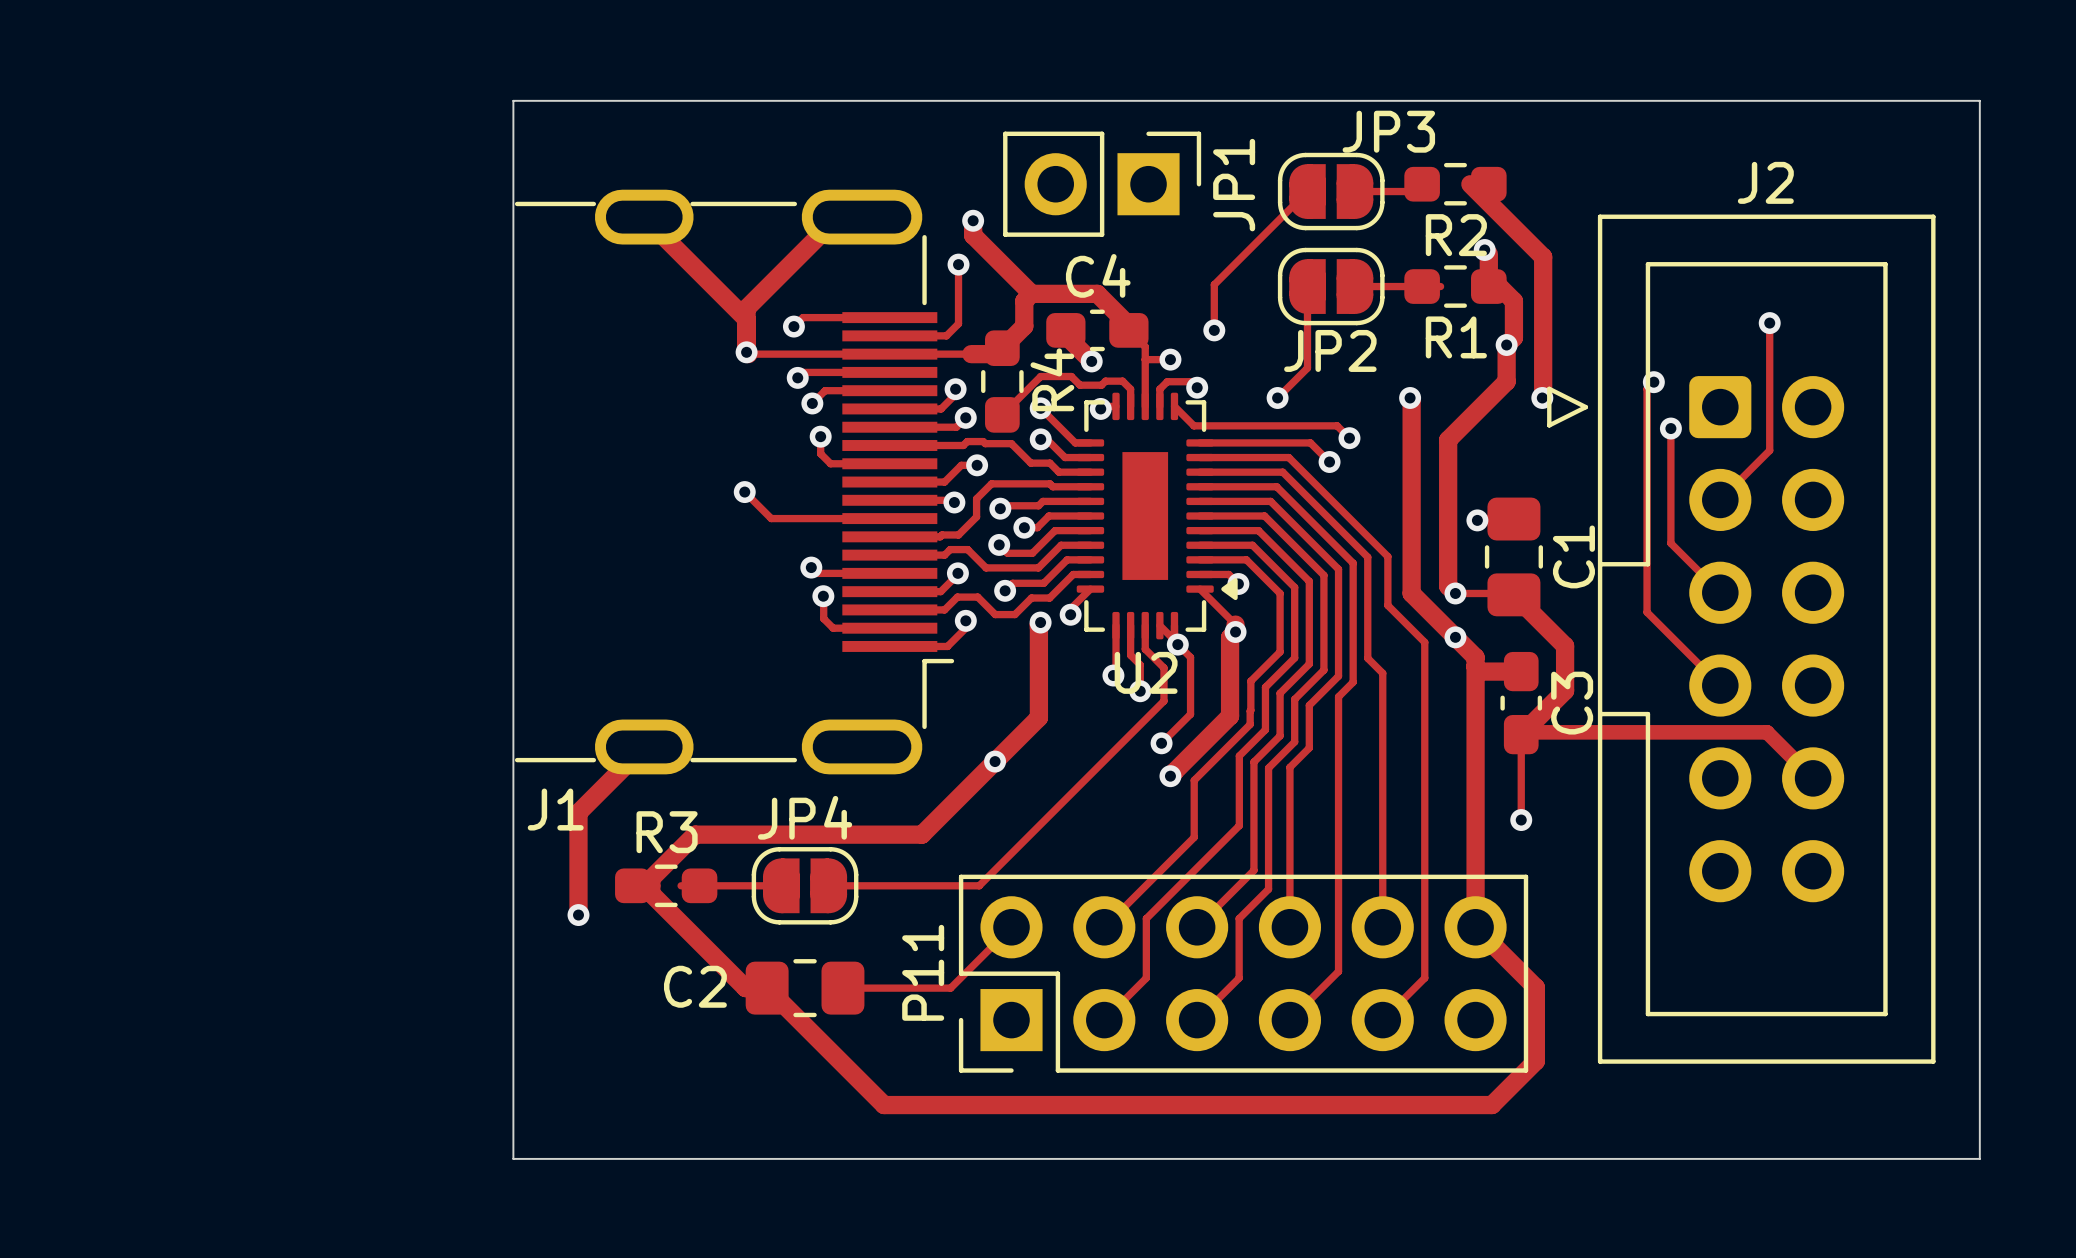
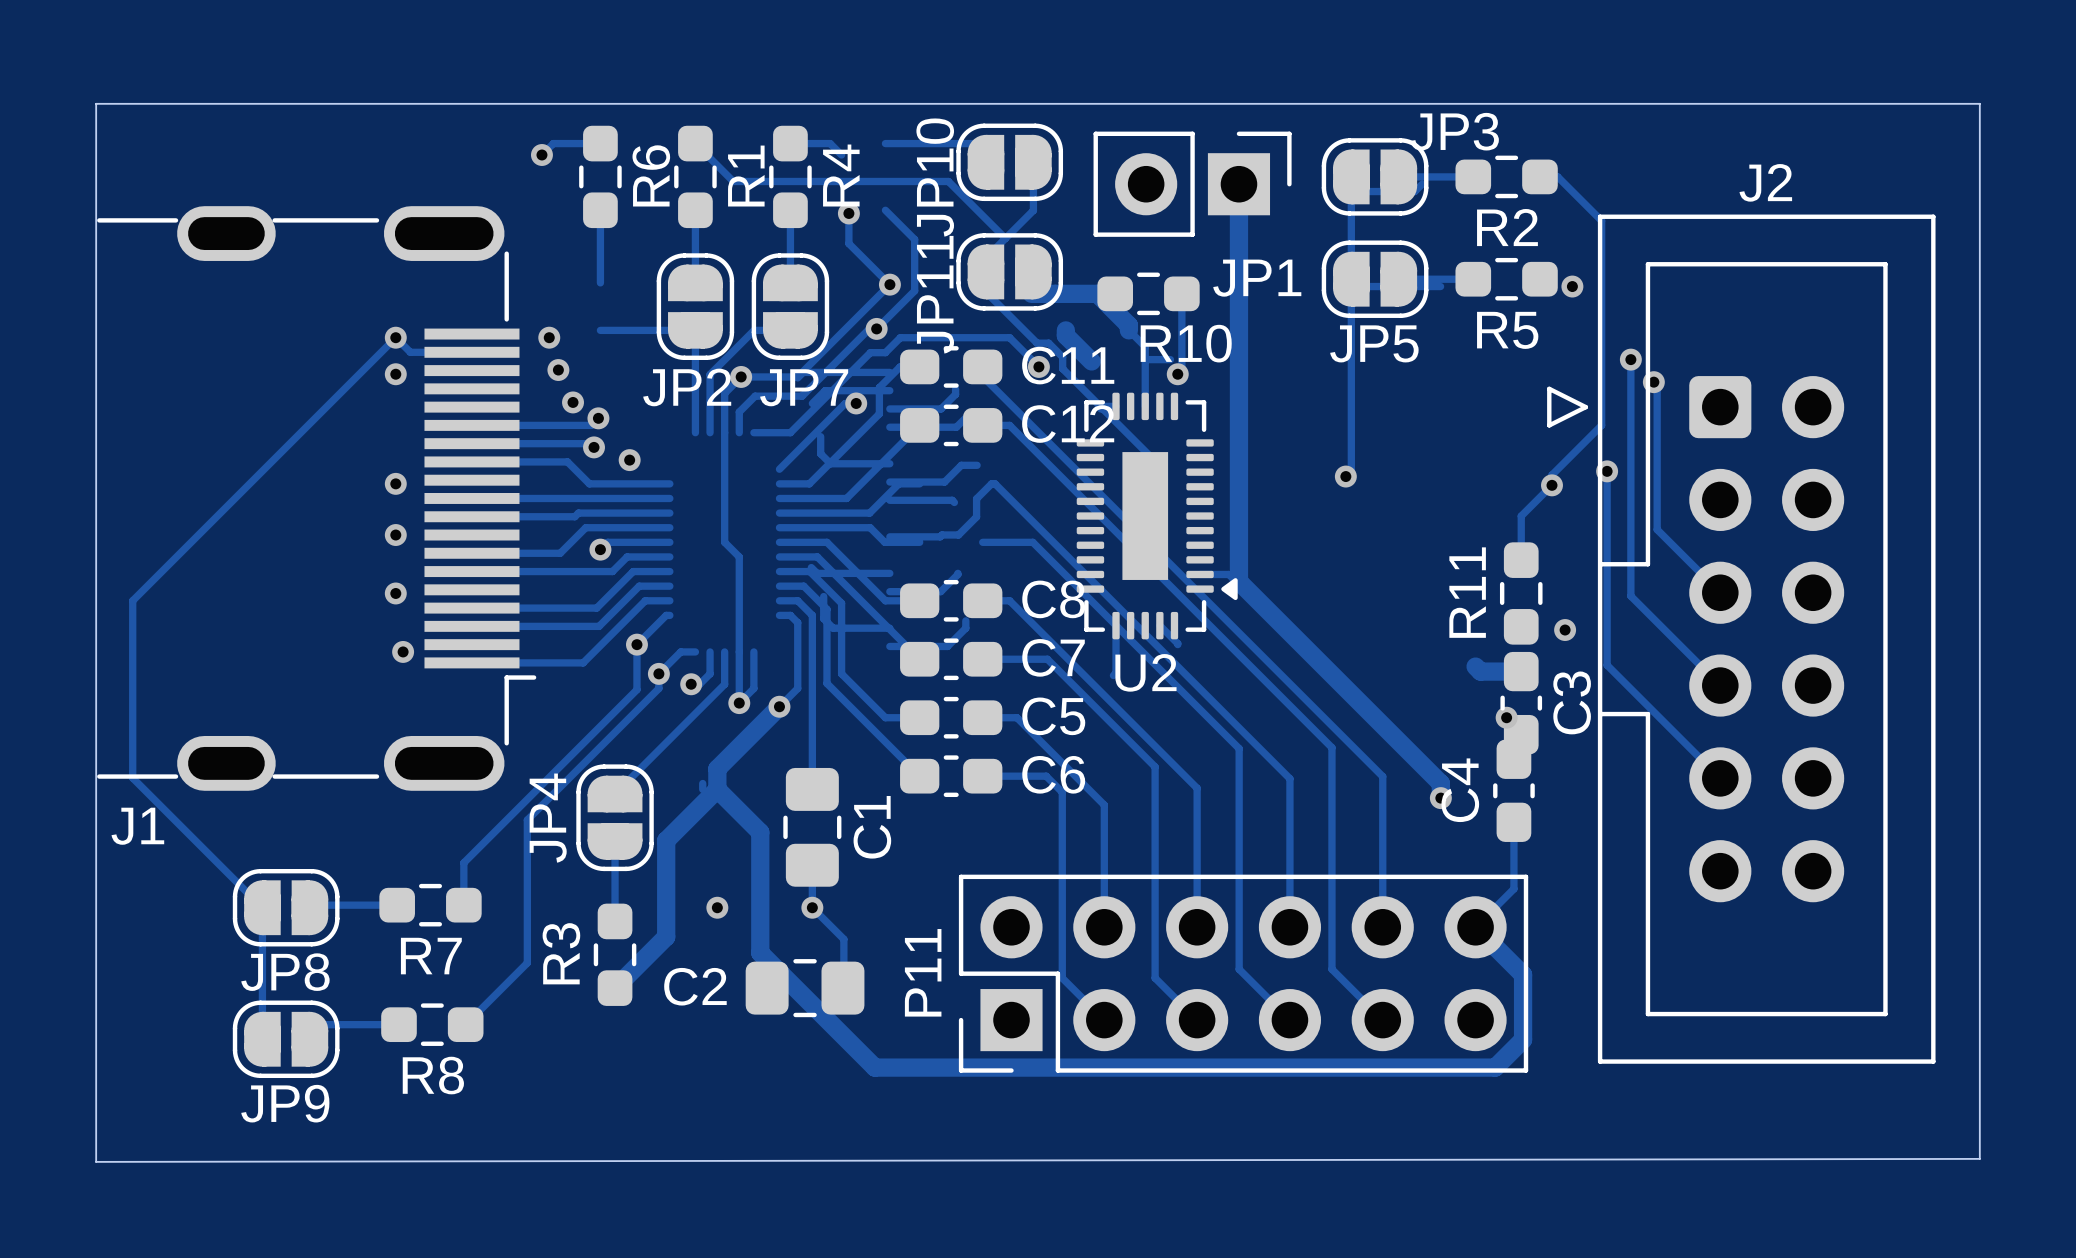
board edge: (1979, 103) (1979, 100) (513, 100) (513, 1158) (1979, 1158) -> (1979, 103) (96, 103) (96, 1161) (1979, 1158)
JP3 name position: JP3 (1388, 131) -> JP3 (1454, 131)
track: none -> (600, 143) (553, 143) (541, 154)
track: none -> (695, 143) (733, 181) (948, 181) (1005, 238)
track: none -> (790, 143) (830, 143) (841, 154)
track: none -> (885, 143) (974, 143) (985, 154)
via: none -> (541, 154)
JP10: none -> (1009, 162)
track: none -> (1033, 162) (1033, 210) (985, 257) (985, 292) (1037, 343) (1048, 343) (1062, 357) (1062, 368) (1155, 461) (1155, 498)
R6: none -> (600, 176)
track: none -> (1351, 176) (1351, 471) (1345, 476)
track: none -> (1398, 176) (1473, 176)
track: none -> (1539, 176) (1557, 176) (1601, 220) (1601, 425) (1551, 475) (1551, 485) (1521, 516) (1521, 560)
JP1 position: (1102, 184) -> (1192, 184)
track: none -> (1238, 184) (1238, 581) (1440, 783) (1440, 798)
R2 position: (1455, 184) -> (1506, 176)
track: (1470, 184) (1543, 257) (1542, 397) -> none
JP1 name rotation: 0° (1234, 185) -> 90° clockwise (1257, 278)
track: (1307, 191) (1214, 284) (1214, 330) -> none
JP3 position: (1331, 191) -> (1375, 176)
track: none -> (600, 210) (600, 282)
track: none -> (695, 210) (695, 282)
track: none -> (790, 210) (790, 282)
track: none -> (885, 210) (914, 239) (914, 290) (876, 328) (869, 328) (802, 396) (755, 396) (739, 412) (739, 432)
track: none -> (848, 213) (848, 243) (889, 284) (797, 376) (741, 376) (724, 393) (724, 542) (739, 556) (739, 703) (753, 688) (753, 651)
via: none -> (848, 213)
track: (644, 217) (746, 319) -> none
track: (862, 217) (837, 217) (746, 308) (746, 352) (748, 354) (996, 354) (1024, 326) (1024, 301) (1031, 293) (973, 235) (973, 220) -> none
via: (973, 220) -> none
track: (1484, 250) (1488, 254) (1488, 286) (1499, 286) (1513, 301) (1513, 337) (1506, 345) (1506, 381) (1448, 440) (1448, 586) (1455, 593) (1512, 593) (1565, 646) (1565, 690) (1521, 734) -> none
via: (1484, 250) -> none
track: (958, 264) (958, 323) (946, 335) (889, 335) -> none
via: (958, 264) -> none
JP11: none -> (1009, 271)
C4 name position: C4 (1098, 275) -> C4 (1460, 790)
JP5: none -> (1375, 279)
track: none -> (1398, 279) (1473, 279)
R5: none -> (1506, 279)
via: none -> (889, 284)
track: (1307, 286) (1307, 368) (1277, 397) -> none
JP2 rotation: 0° (1331, 286) -> 90° clockwise (695, 306)
JP2 position: (1331, 286) -> (695, 306)
R1 rotation: 0° (1455, 286) -> 90° clockwise (695, 176)
R1 position: (1455, 286) -> (695, 176)
via: none -> (1572, 286)
R10: none -> (1148, 293)
track: none -> (1181, 293) (1181, 370) (1177, 374)
JP7: none -> (790, 306)
track: (889, 317) (802, 317) (793, 326) -> none
track: (1769, 323) (1769, 450) (1720, 499) -> none
via: (1769, 323) -> none
via: (793, 326) -> none
via: none -> (876, 328)
track: none -> (600, 330) (695, 330) (695, 432)
track: none -> (790, 330) (754, 330) (710, 374) (710, 432)
C4 rotation: 0° (1097, 330) -> 90° clockwise (1513, 790)
C4 position: (1097, 330) -> (1513, 790)
via: (1214, 330) -> none
via: none -> (395, 337)
via: none -> (549, 337)
R1 name position: R1 (1456, 337) -> R1 (746, 176)
via: (1506, 345) -> none
track: none -> (471, 352) (410, 352) (395, 337) (132, 600) (132, 778) (262, 907) (262, 1039)
via position: (746, 352) -> (741, 376)
via: (1170, 359) -> none
via: none -> (1630, 359)
via: (1091, 361) -> none
track: none -> (919, 366) (900, 366) (879, 387) (879, 413) (809, 483) (779, 483)
C11: none -> (951, 366)
track: none -> (1038, 366) (1009, 337) (900, 337) (885, 352) (870, 352) (790, 432) (753, 432)
via: none -> (1038, 366)
via: none -> (558, 370)
via: none -> (395, 374)
via: none -> (1177, 374)
via: (797, 377) -> none
R4 position: (1002, 381) -> (790, 176)
track: (1653, 382) (1647, 388) (1647, 612) -> (1630, 359) (1630, 596) (1647, 612)
track: (1197, 387) (1191, 381) (1167, 381) (1159, 389) (1159, 406) -> none
via: (1197, 387) -> none
via: (955, 389) -> none
via: (1277, 397) -> none
track: (1410, 397) (1411, 399) (1411, 593) (1475, 657) (1475, 927) -> (1513, 822) (1513, 888) (1475, 927)
via: (1410, 397) -> none
via: (1542, 397) -> none
via: none -> (573, 402)
via: (812, 403) -> none
track: none -> (856, 403) (845, 403) (779, 469)
via: none -> (856, 403)
track: (1130, 406) (1130, 389) (1122, 381) (1105, 381) (1101, 385) (1080, 385) (1071, 376) (1040, 376) (1002, 414) -> none
track: (1174, 406) (1193, 425) (1337, 425) (1349, 438) -> none
track: (1040, 408) (1075, 442) (1090, 442) -> none
via: (1040, 408) -> none
via: (1100, 408) -> none
via: (965, 417) -> none
track: none -> (598, 418) (591, 425) (471, 425)
via: none -> (598, 418)
track: none -> (919, 425) (846, 498) (779, 498)
C12: none -> (951, 425)
track: (1670, 428) (1670, 543) -> (1657, 379) (1657, 529) (1670, 543)
via: (1670, 428) -> none
via: (820, 436) -> none
via: (1349, 438) -> none
track: (1040, 439) (1046, 439) (1065, 457) (1090, 457) -> none
via: (1040, 439) -> none
track: (1200, 442) (1310, 442) (1329, 462) -> none
track: none -> (471, 443) (590, 443) (594, 447)
track: (889, 445) (963, 445) (967, 441) (1011, 443) (1030, 463) (1049, 463) (1058, 472) (1090, 472) -> none
via: none -> (594, 447)
track: (1200, 457) (1288, 457) (1387, 556) (1387, 605) (1424, 642) (1424, 978) (1382, 1020) -> (982, 425) (1009, 425) (1331, 747) (1331, 969) (1382, 1020)
via: none -> (629, 460)
track: none -> (471, 461) (567, 461) (589, 483) (669, 483)
via position: (1329, 462) -> (1345, 476)
via: (977, 465) -> none
track: none -> (1607, 471) (1607, 665) (1720, 778)
via: none -> (1607, 471)
track: (1200, 472) (1282, 472) (1367, 557) (1367, 658) (1382, 673) (1382, 776) -> (982, 366) (982, 376) (1382, 776)
J1 position: (734, 482) -> (316, 498)
via: none -> (395, 483)
track: none -> (919, 483) (898, 483) (869, 513) (779, 513)
track: (995, 483) (1049, 483) (1052, 486) (1090, 486) -> none
via: none -> (1551, 485)
track: (1200, 486) (1276, 486) (1353, 563) (1353, 682) (1338, 696) (1338, 971) (1289, 1020) -> none
track: (744, 492) (771, 518) (889, 518) -> none
via: (744, 492) -> none
track: none -> (471, 498) (669, 498)
track: (1090, 501) (1042, 501) (1038, 505) (1007, 505) (1002, 510) -> none
track: (1200, 501) (1270, 501) (1338, 569) (1338, 676) (1309, 705) (1309, 747) (1289, 767) (1289, 778) -> (995, 483) (1289, 778)
via: (954, 502) -> none
via: (1000, 508) -> none
track: none -> (669, 513) (578, 513) (574, 516) (471, 516)
track: (1090, 516) (1048, 516) (1037, 527) (1024, 527) -> none
track: (1200, 516) (1264, 516) (1323, 575) (1323, 670) (1294, 699) (1294, 741) (1268, 768) (1268, 889) (1239, 918) -> (982, 542) (1032, 542) (1239, 748) (1239, 918)
via: (1477, 520) -> none
track: none -> (669, 527) (585, 527) (560, 553) (471, 553)
track: none -> (779, 527) (870, 527) (884, 542) (919, 542)
via: (1024, 527) -> none
track: (1090, 530) (1055, 530) (1032, 553) (1007, 553) (999, 544) -> none
track: (1200, 530) (1258, 530) (1309, 581) (1309, 664) (1280, 693) (1280, 735) (1253, 762) (1253, 870) (1197, 927) -> (982, 600) (1009, 600) (1197, 788) (1197, 927)
via: none -> (395, 535)
track: none -> (669, 542) (607, 542) (600, 549)
track: none -> (779, 542) (826, 542) (885, 600) (919, 600)
via: (999, 544) -> none
track: (1090, 545) (1061, 545) (1038, 567) (986, 567) (967, 549) (950, 549) (944, 555) (889, 555) -> none
track: (1200, 545) (1252, 545) (1294, 587) (1294, 658) (1265, 687) (1265, 729) (1239, 755) (1239, 825) (1146, 918) (1146, 978) (1104, 1020) -> (982, 776) (1046, 776) (1062, 792) (1062, 978) (1104, 1020)
via: none -> (600, 549)
track: none -> (669, 556) (627, 556) (612, 571) (471, 571)
track: none -> (779, 556) (817, 556) (919, 659)
C1 position: (1513, 556) -> (812, 827)
track: (1090, 559) (1067, 559) (1043, 583) (1012, 583) (1005, 590) -> none
track: (1200, 559) (1246, 559) (1280, 593) (1280, 651) (1250, 681) (1250, 724) (1194, 780) (1194, 837) (1104, 927) -> (982, 717) (1016, 717) (1104, 805) (1104, 927)
via: (811, 567) -> none
track: none -> (669, 571) (633, 571) (596, 608) (471, 608)
track: none -> (779, 571) (809, 571) (841, 603) (841, 673) (885, 717) (919, 717)
via: (957, 573) -> none
track: (1090, 574) (1073, 574) (1049, 598) (1031, 598) (1014, 614) (995, 614) (977, 597) (957, 597) (944, 609) (889, 609) -> none
via: (1238, 583) -> none
track: none -> (669, 586) (639, 586) (599, 626) (471, 626)
track: none -> (779, 586) (803, 586) (826, 609) (826, 683) (919, 776)
track: (1090, 589) (1070, 608) (1070, 614) -> none
track: (1200, 589) (1235, 624) (1235, 632) (1230, 637) (1230, 716) (1170, 776) -> none
via: (1005, 590) -> none
via: none -> (395, 593)
via: (1455, 593) -> none
R11: none -> (1521, 593)
via: (823, 596) -> none
track: none -> (669, 600) (645, 600) (583, 662) (471, 662)
track: none -> (779, 600) (797, 600) (812, 615) (812, 789)
C8: none -> (951, 600)
via: (1070, 614) -> none
track: none -> (669, 615) (666, 615) (636, 644) (636, 689) (463, 862) (463, 905)
track: none -> (779, 615) (790, 615) (797, 622) (797, 688) (717, 768) (717, 789)
via: (965, 620) -> none
track: (1040, 622) (1038, 624) (1038, 717) (921, 834) (695, 834) (651, 878) (651, 893) (745, 988) (767, 988) (884, 1105) (1492, 1105) (1535, 1061) (1535, 987) (1523, 974) -> (717, 789) (760, 832) (760, 952) (874, 1067) (1495, 1067) (1523, 1039) (1523, 974)
via: (1040, 622) -> none
track: (1130, 625) (1130, 655) (1140, 664) (1140, 691) -> none
track: (1145, 625) (1145, 649) (1163, 667) (1163, 701) (979, 885) (828, 885) -> none
track: (1174, 625) (1174, 641) (1190, 657) (1190, 714) (1161, 743) -> none
via: none -> (1565, 630)
via: (1235, 632) -> none
via: (1455, 637) -> none
via: none -> (636, 644)
via: (1177, 644) -> none
via: none -> (403, 651)
track: none -> (695, 651) (680, 651) (658, 673) (658, 688) (527, 820) (527, 963) (465, 1024)
track: none -> (710, 651) (710, 673) (699, 684) (691, 684)
track: none -> (724, 651) (724, 684) (615, 794)
C7: none -> (951, 659)
track: none -> (982, 659) (1047, 659) (1155, 766) (1155, 978) (1197, 1020)
via: none -> (658, 673)
via: (1113, 675) -> none
via: none -> (691, 684)
via: (1140, 691) -> none
via: none -> (739, 703)
via: none -> (779, 706)
C5: none -> (951, 717)
via: none -> (1506, 717)
track: (1521, 734) (1521, 820) -> none
track: (1521, 734) (1523, 732) (1767, 732) (1813, 778) -> none
via: (1161, 743) -> none
track: (644, 746) (578, 812) (578, 915) -> none
via: (995, 761) -> none
C6: none -> (951, 776)
via: (1170, 776) -> none
track: none -> (702, 783) (702, 789)
track: none -> (717, 789) (666, 840) (666, 936) (615, 988)
via: none -> (1440, 798)
JP4 name position: JP4 (805, 817) -> JP4 (548, 818)
via: (1521, 820) -> none
R3 name position: R3 (667, 832) -> R3 (561, 953)
track: none -> (615, 841) (615, 921)
track: none -> (812, 865) (812, 907) (843, 939) (843, 973)
R3 rotation: 0° (666, 885) -> 90° clockwise (615, 954)
R3 position: (666, 885) -> (615, 954)
track: (681, 885) (781, 885) -> none
JP4 rotation: 0° (805, 885) -> 90° clockwise (615, 817)
JP4 position: (805, 885) -> (615, 817)
track: none -> (397, 905) (312, 905) (309, 907)
R7: none -> (430, 905)
JP8: none -> (286, 907)
via: none -> (717, 907)
via: none -> (812, 907)
via: (578, 915) -> none
track: (1011, 927) (950, 988) (842, 988) -> none
track: (1239, 969) (1239, 978) (1197, 1020) -> (1239, 969) (1289, 1020)
track: none -> (398, 1024) (324, 1024) (309, 1039)
R8: none -> (432, 1024)
JP9: none -> (286, 1039)

